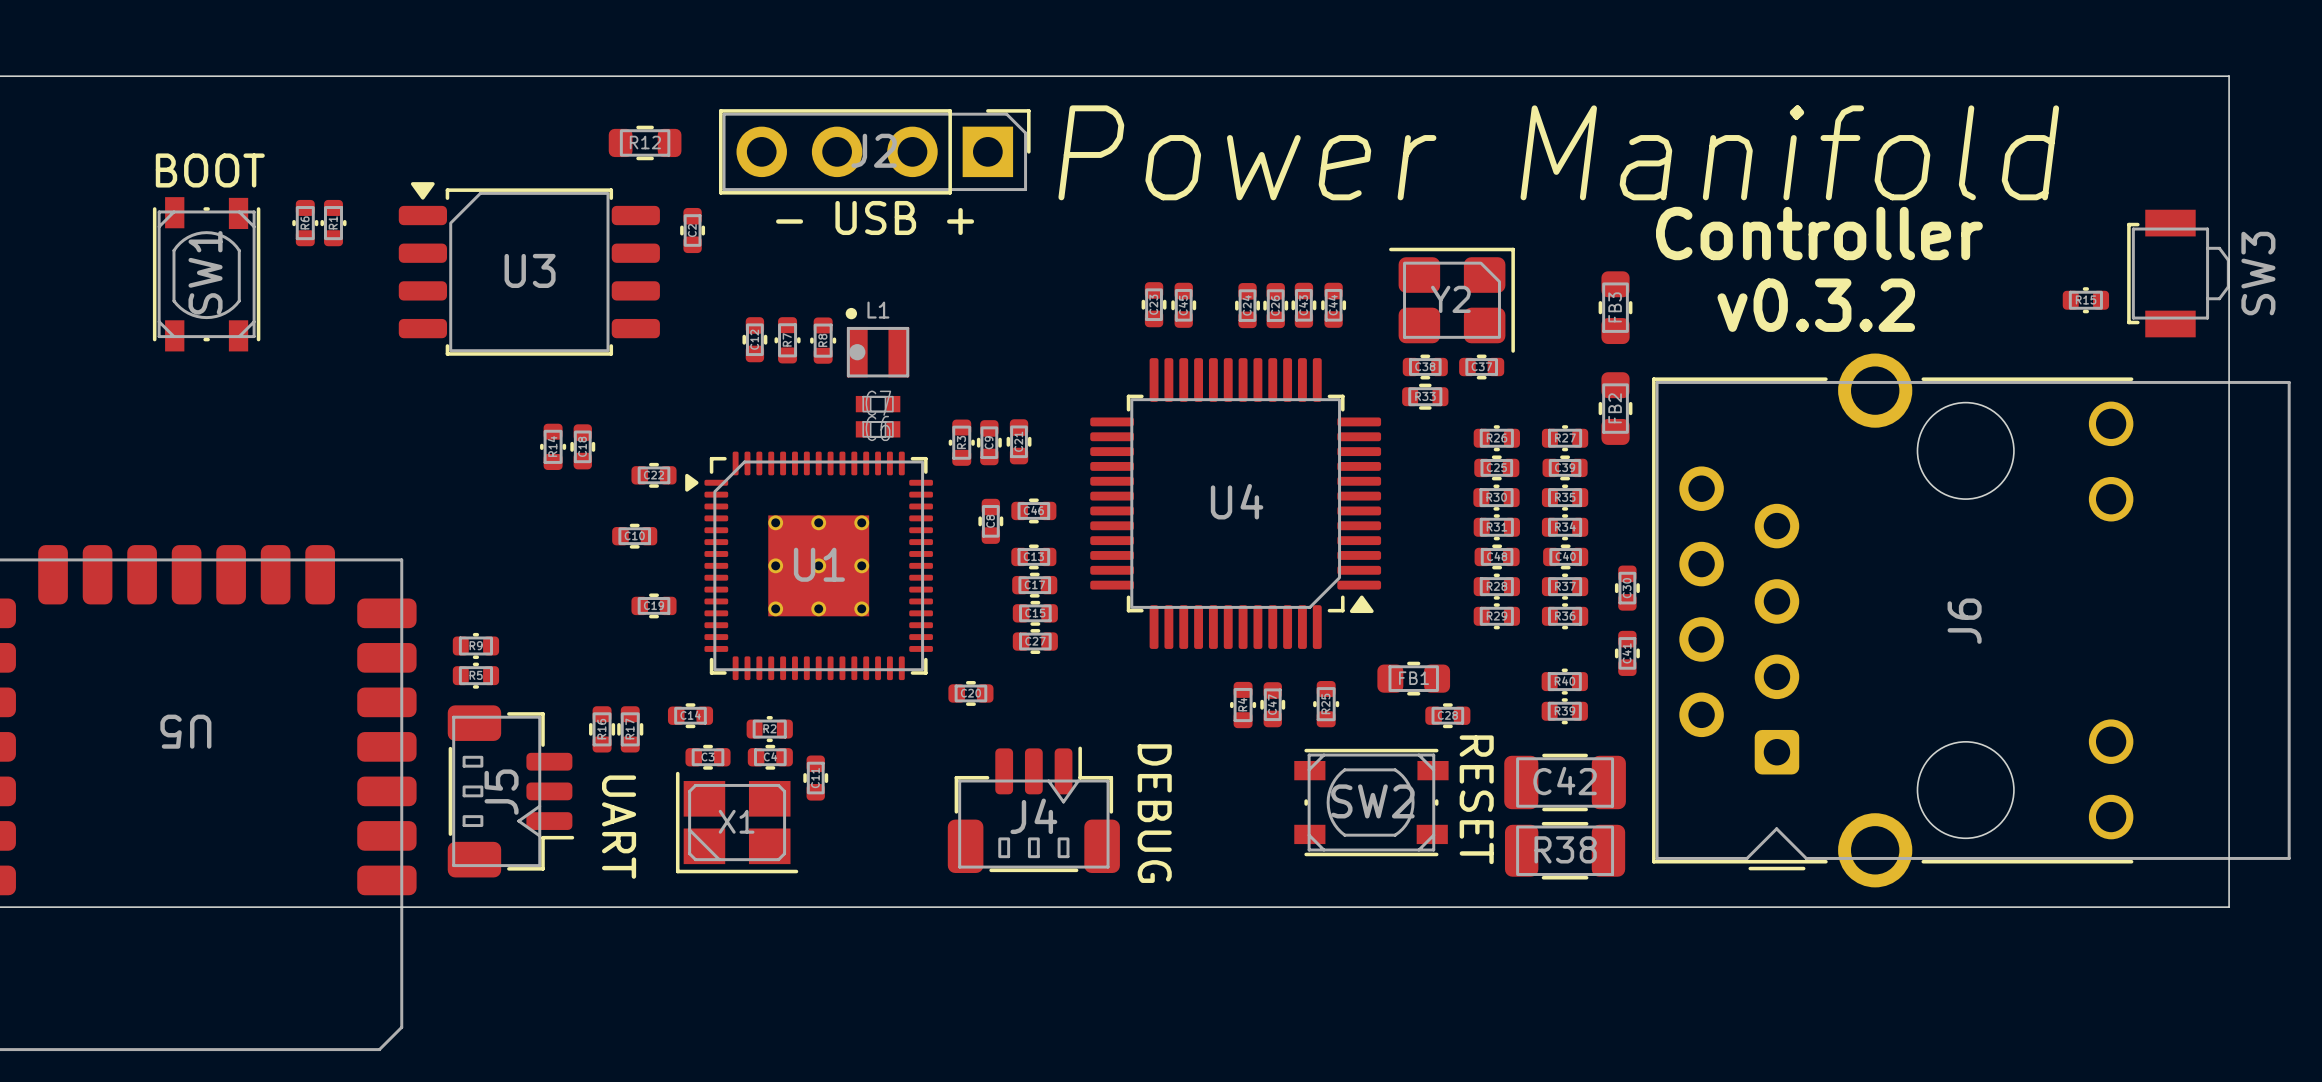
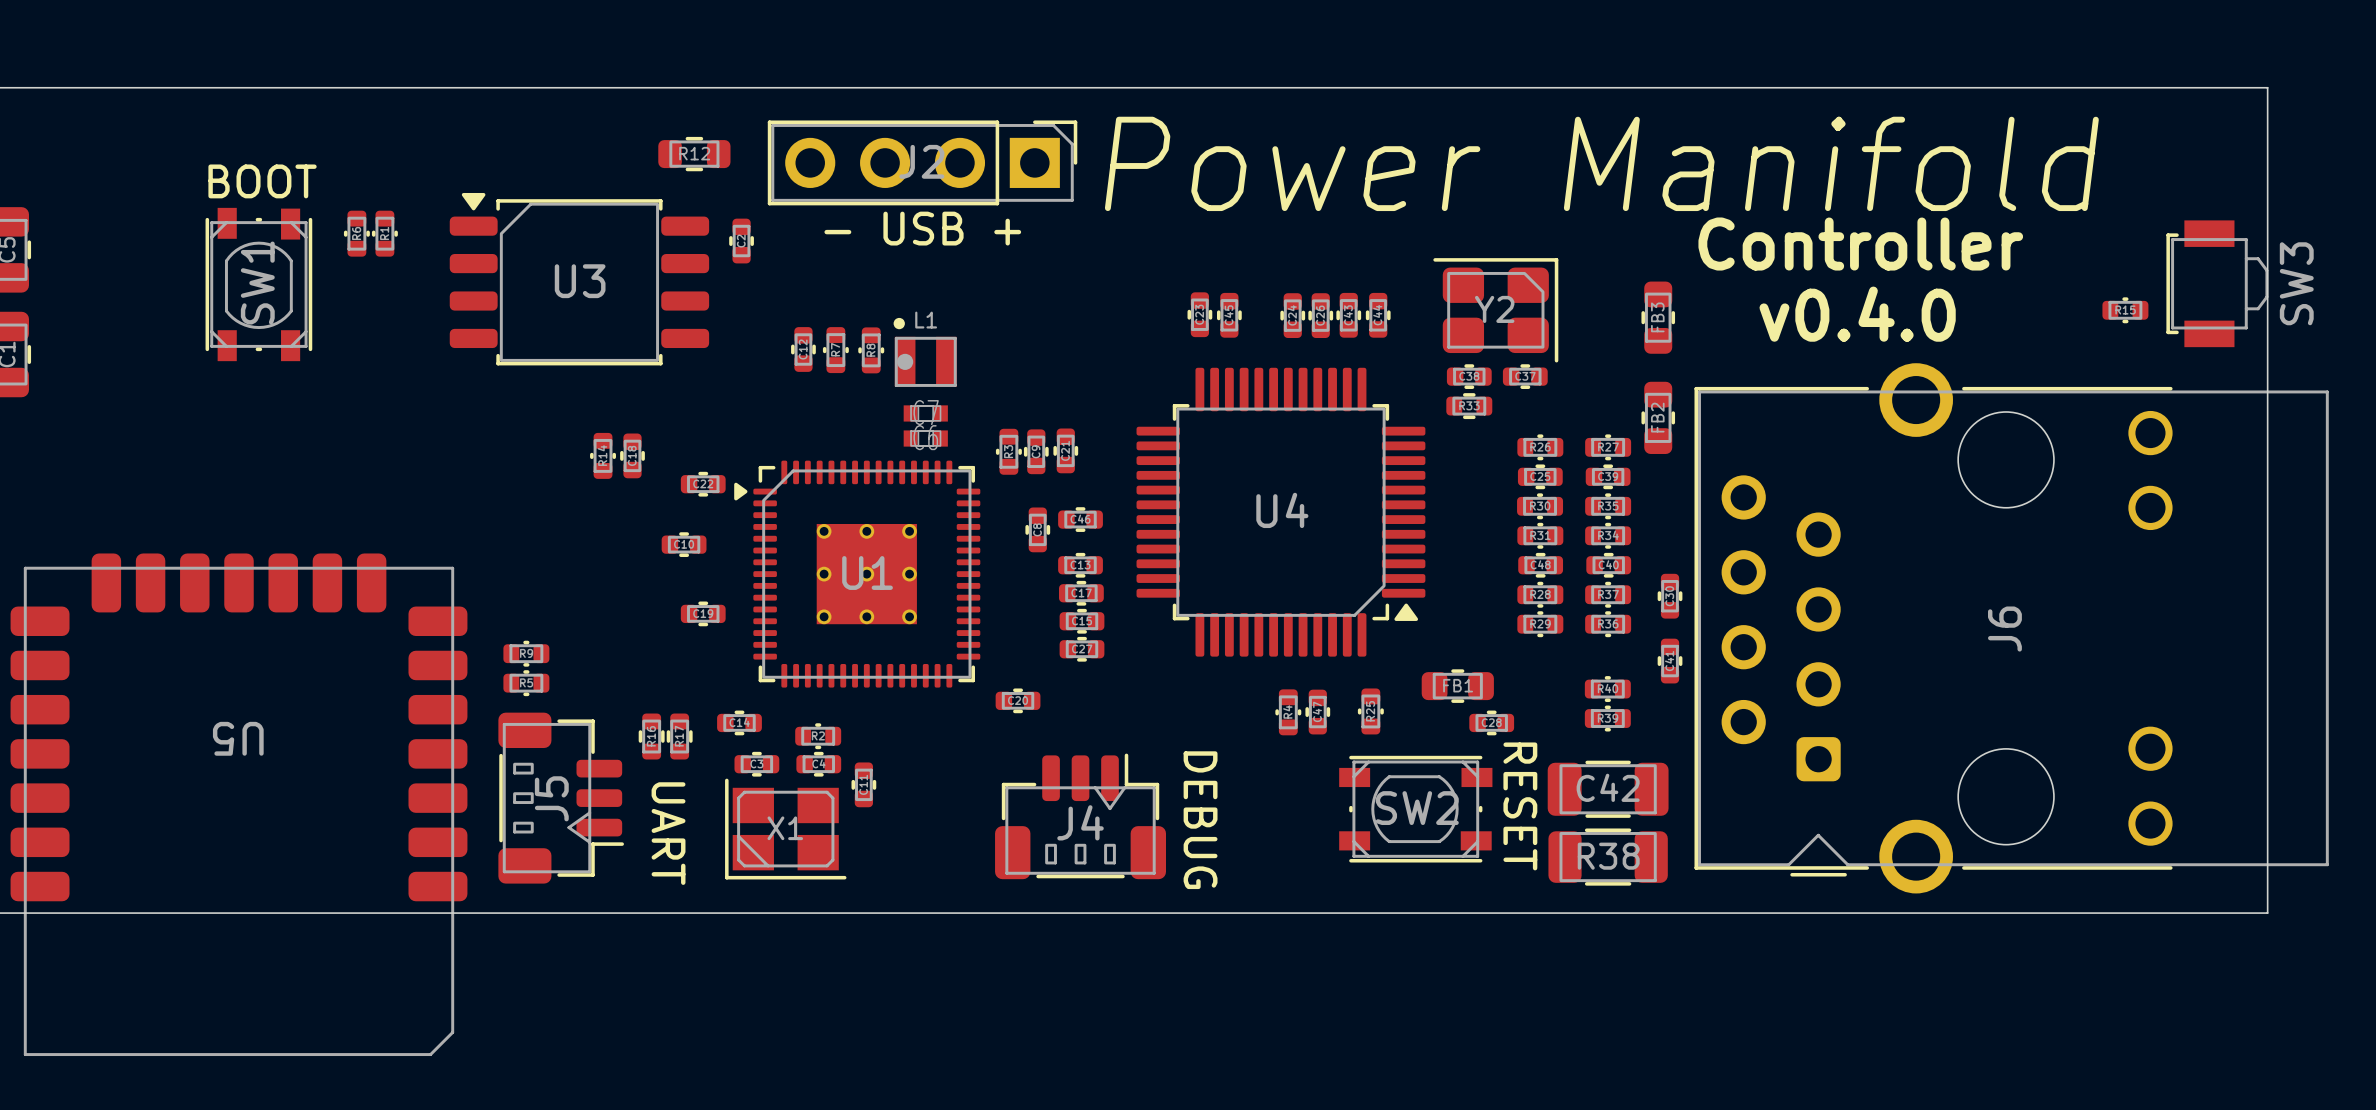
text: v0.3.2 (1816, 305) -> v0.4.0 (1857, 314)

